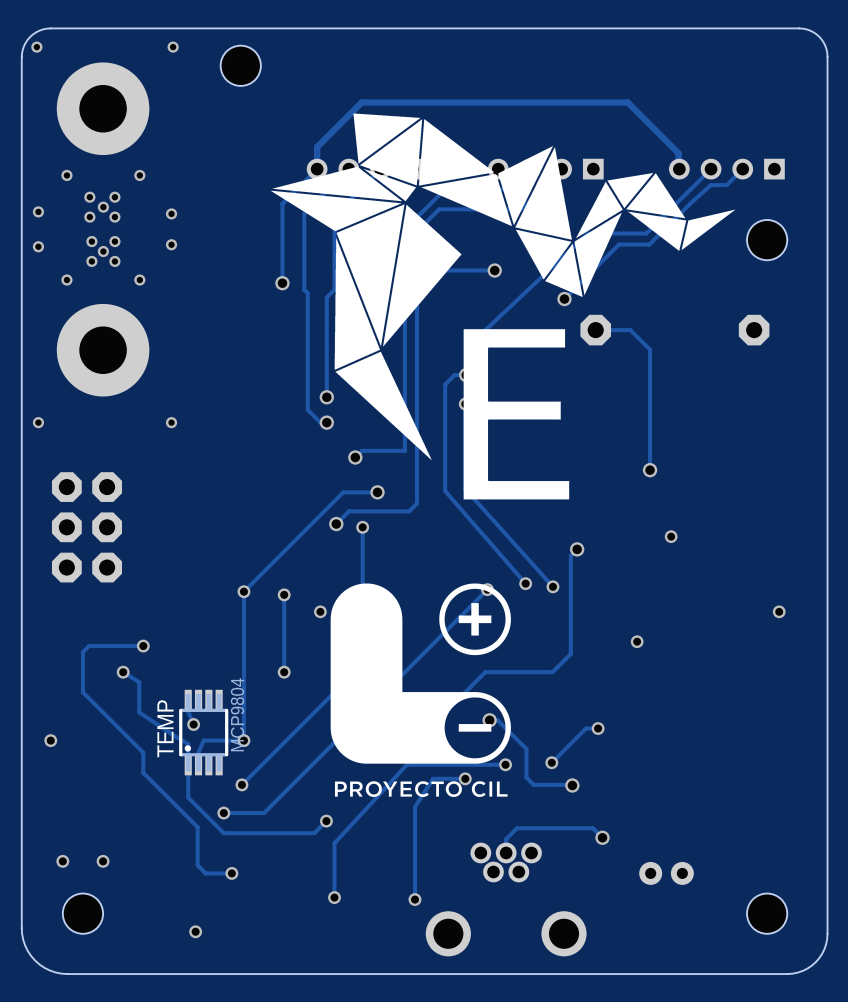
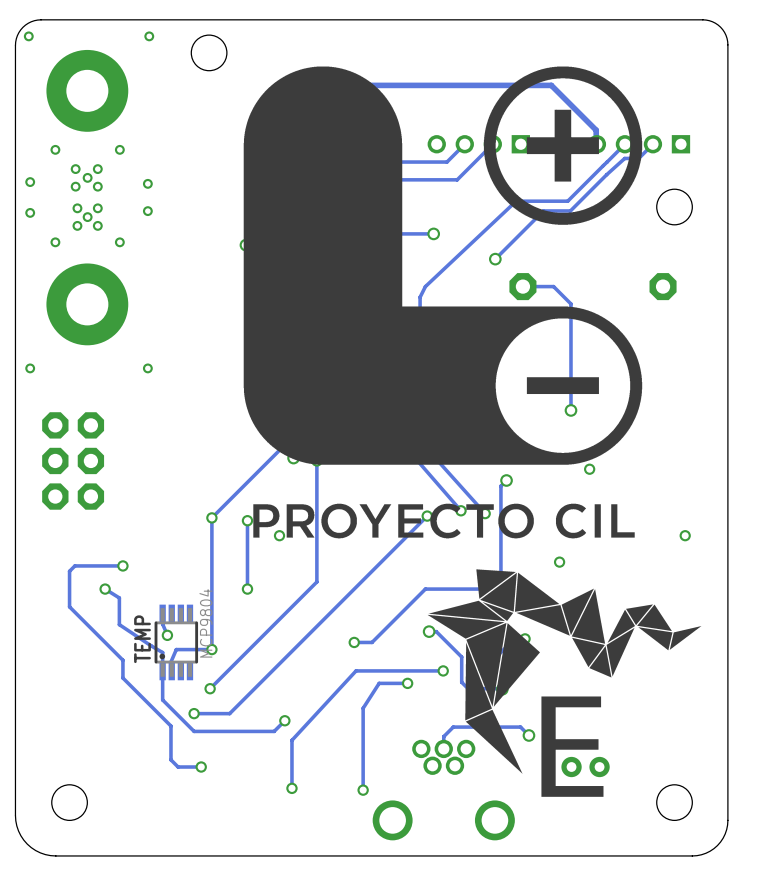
drawing: none -> [243, 66, 643, 539]
drawing: [270, 113, 736, 500] -> none
drawing: [330, 583, 511, 797] -> none
drawing: none -> [427, 569, 702, 797]
via: (50, 740) -> none
via: (62, 861) -> none
via: (103, 861) -> none
via: (195, 931) -> none

